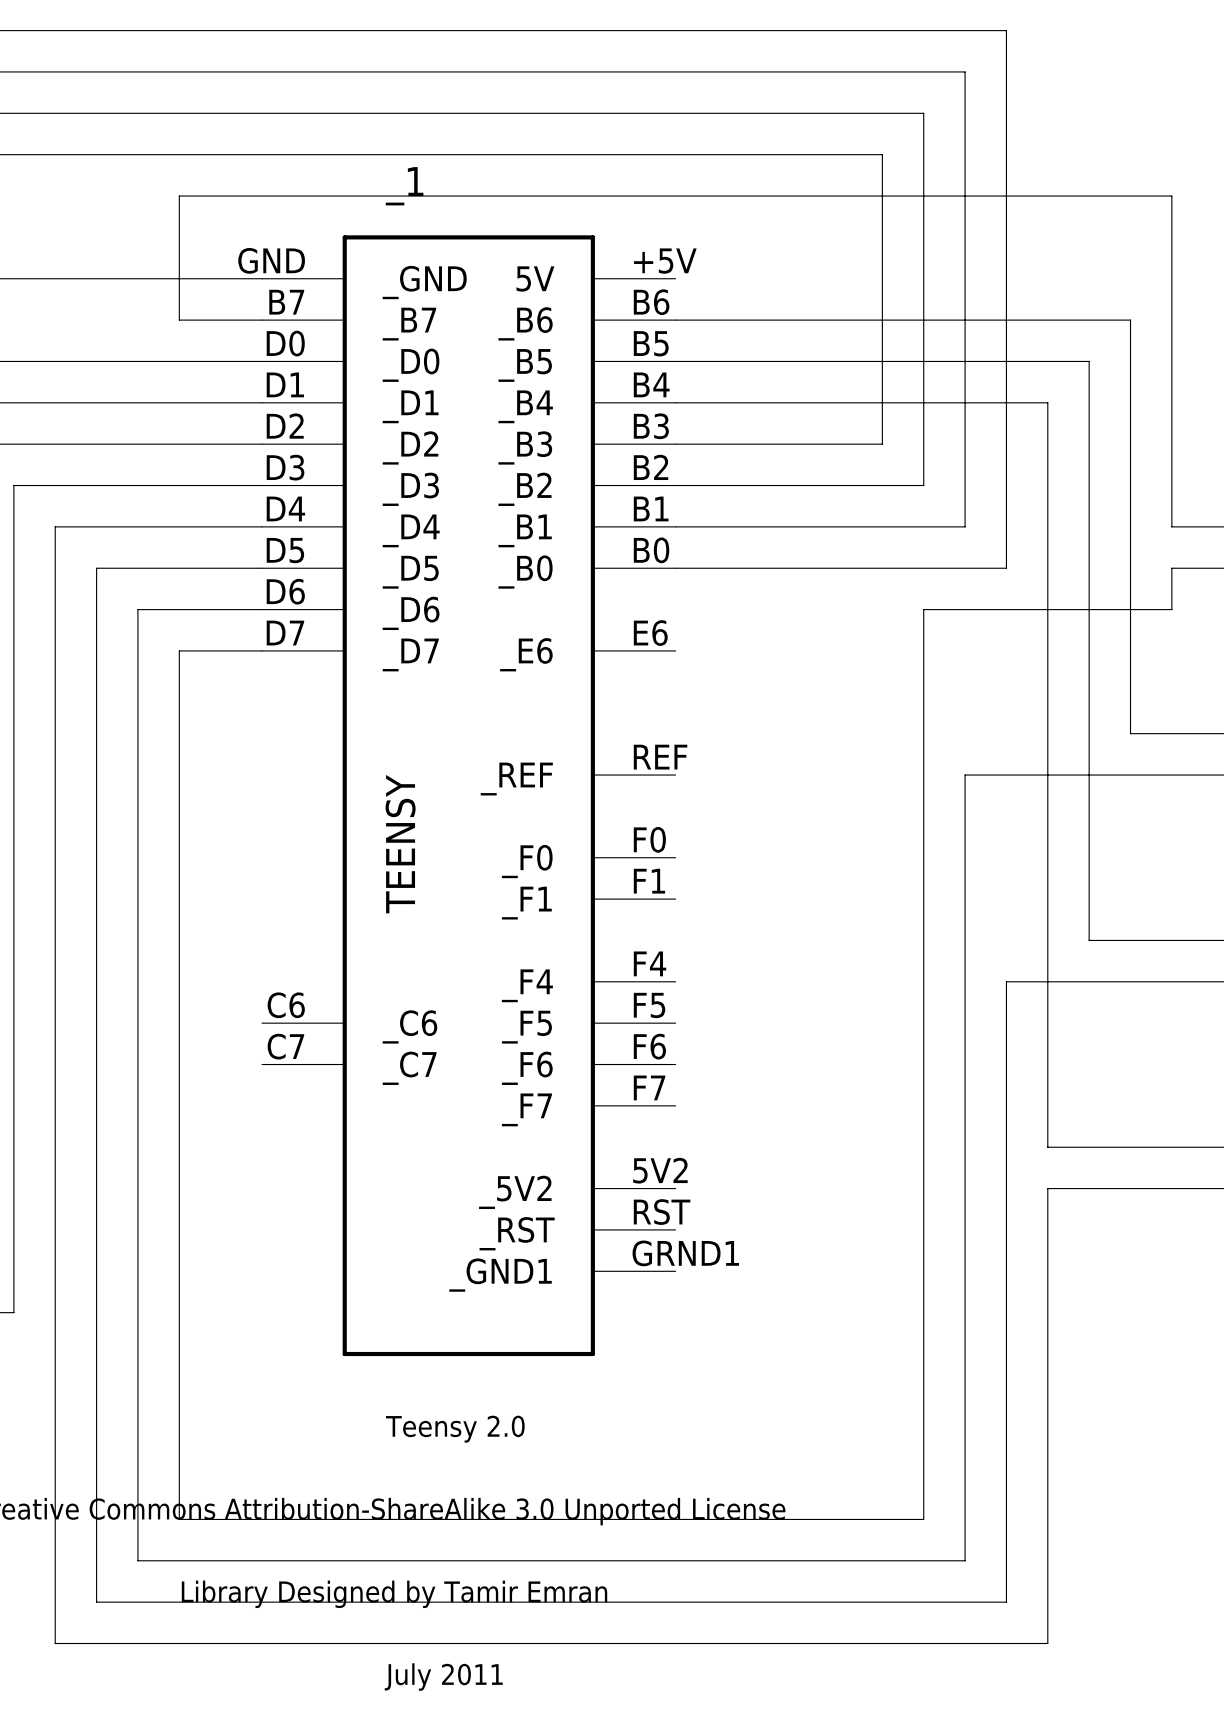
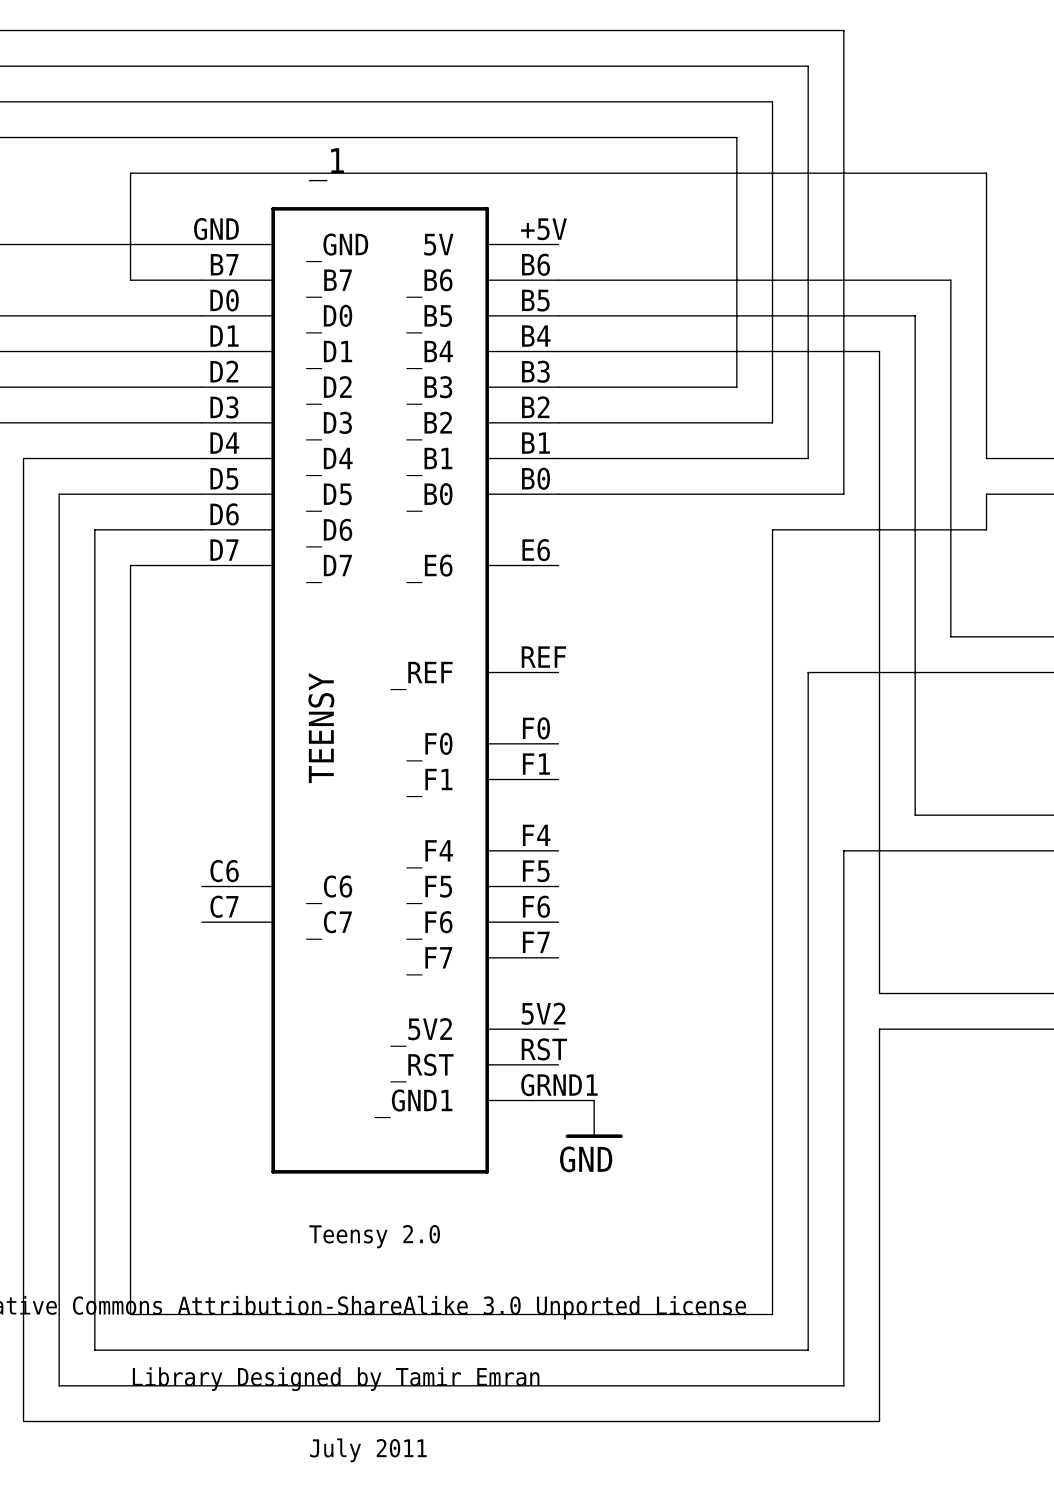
wire: none -> (558, 1100) (594, 1100)
power symbol: none -> GND (594, 1119)

